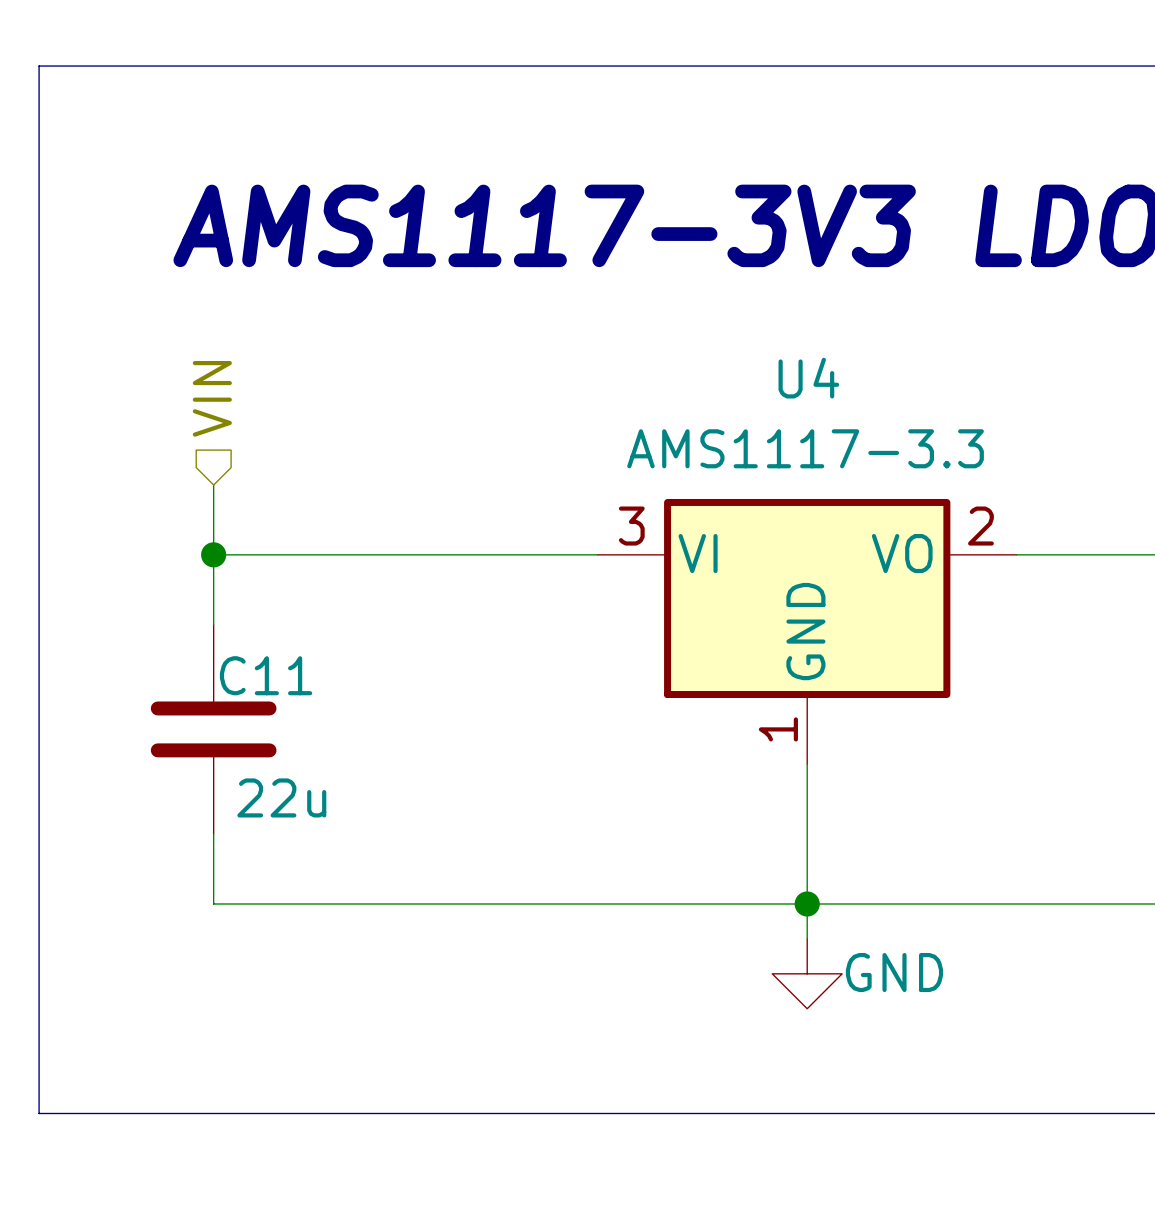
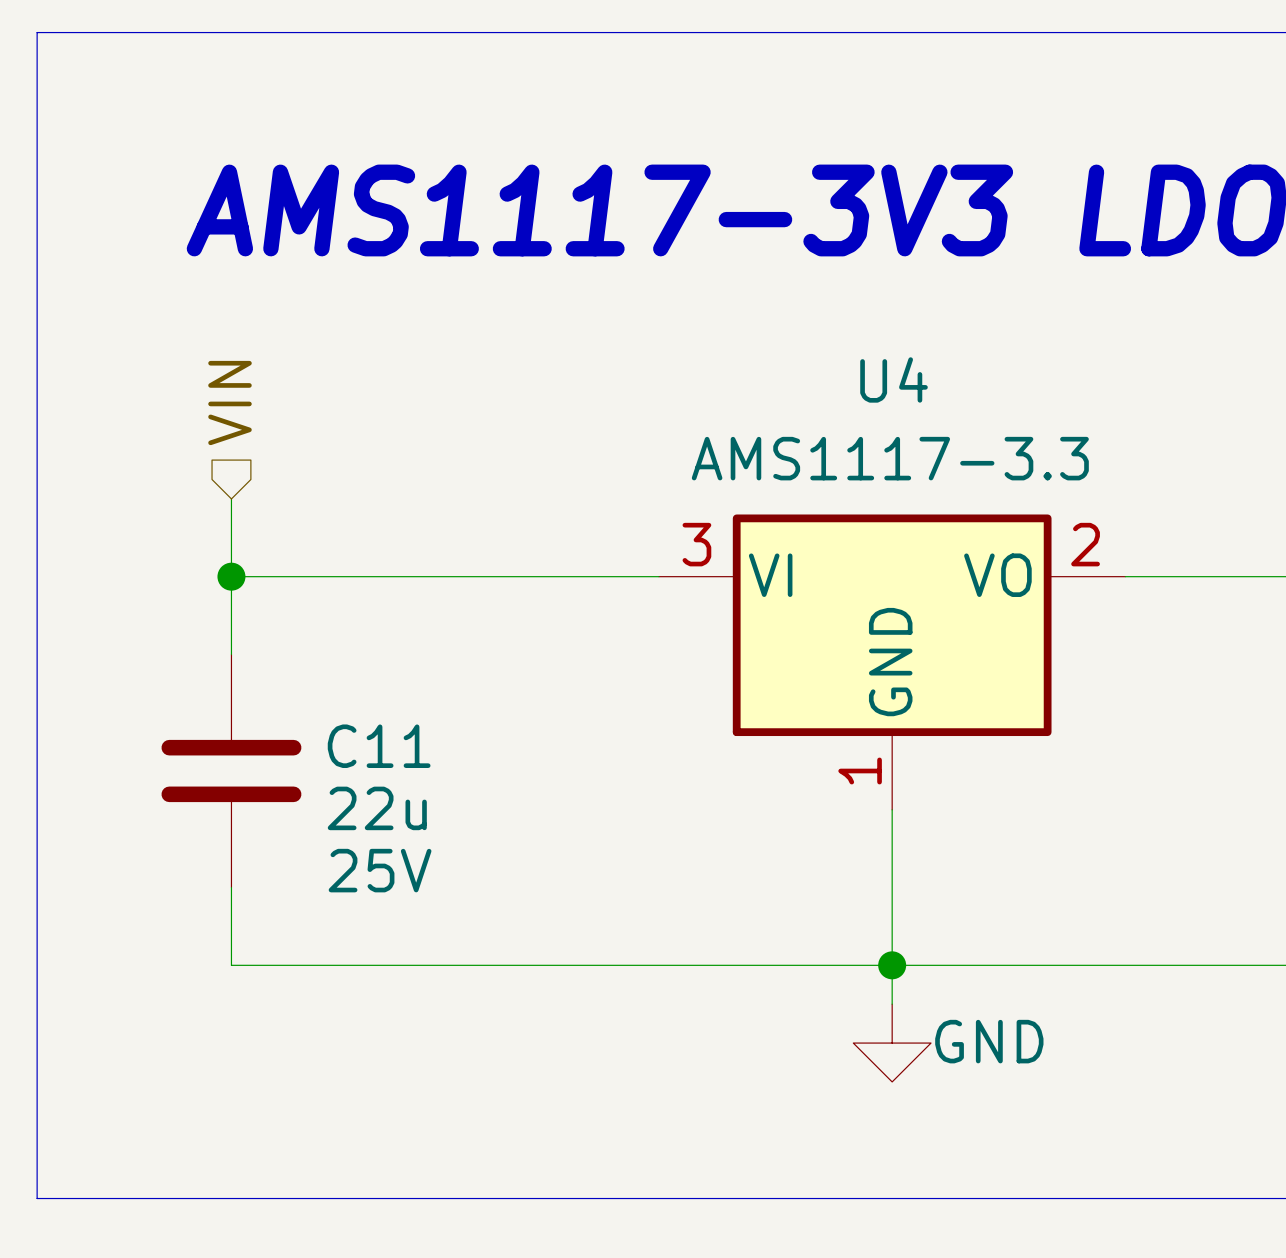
C11 name position: C11 (266, 675) -> C11 (379, 746)
C11 value position: 22u (281, 797) -> 22u (377, 808)
C11 text: none -> 25V (380, 870)

